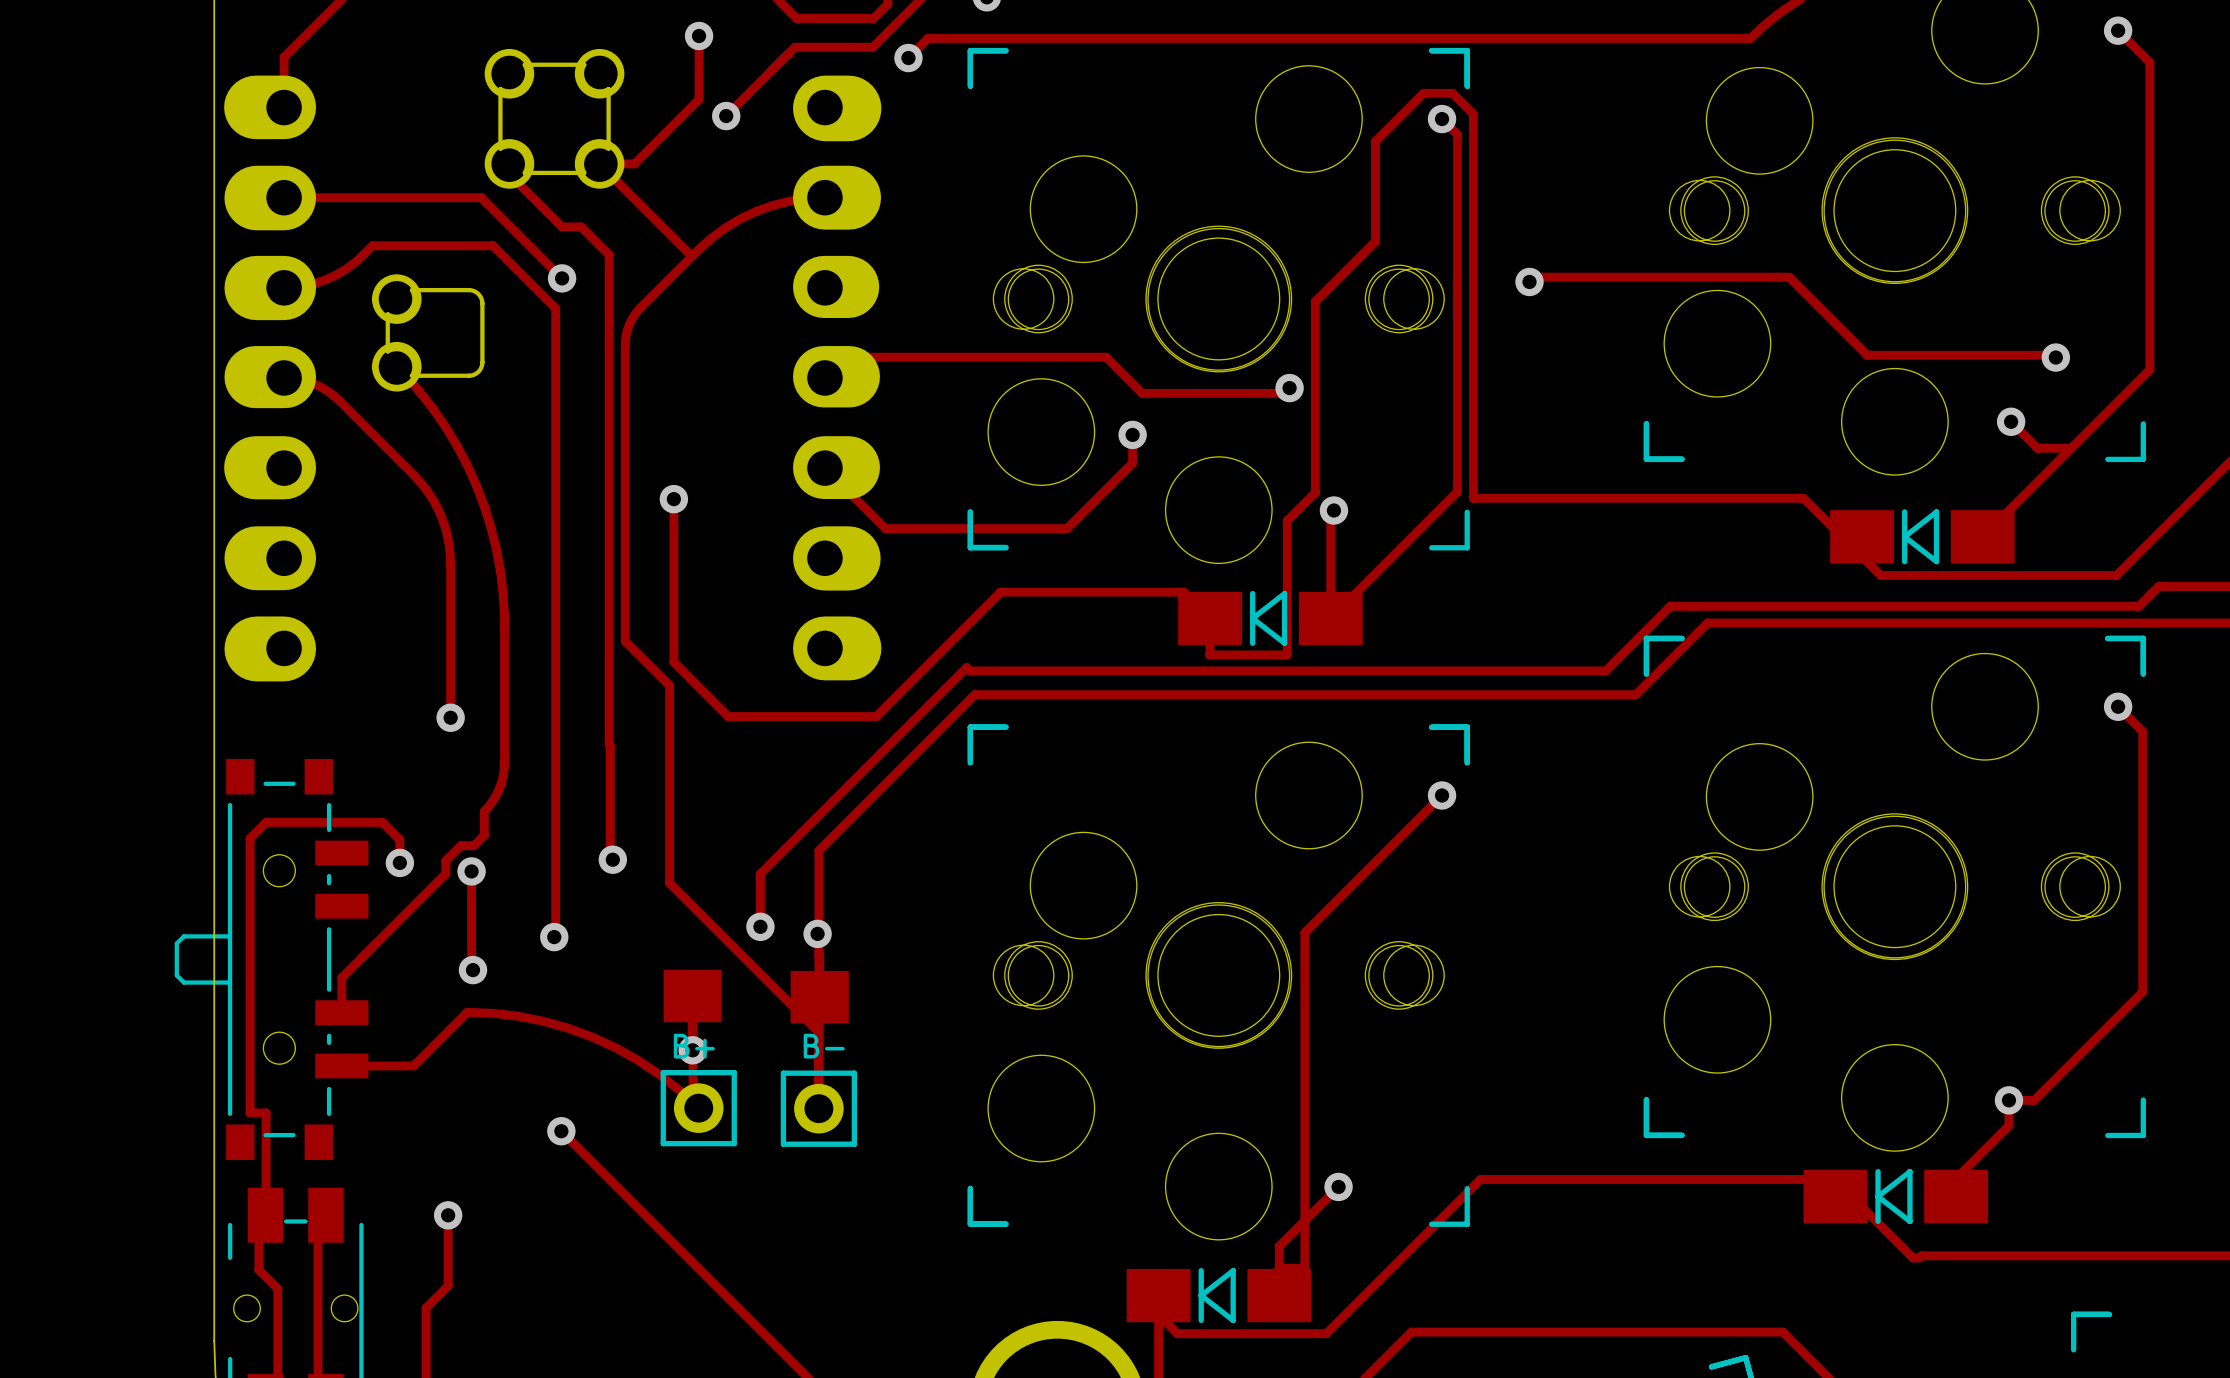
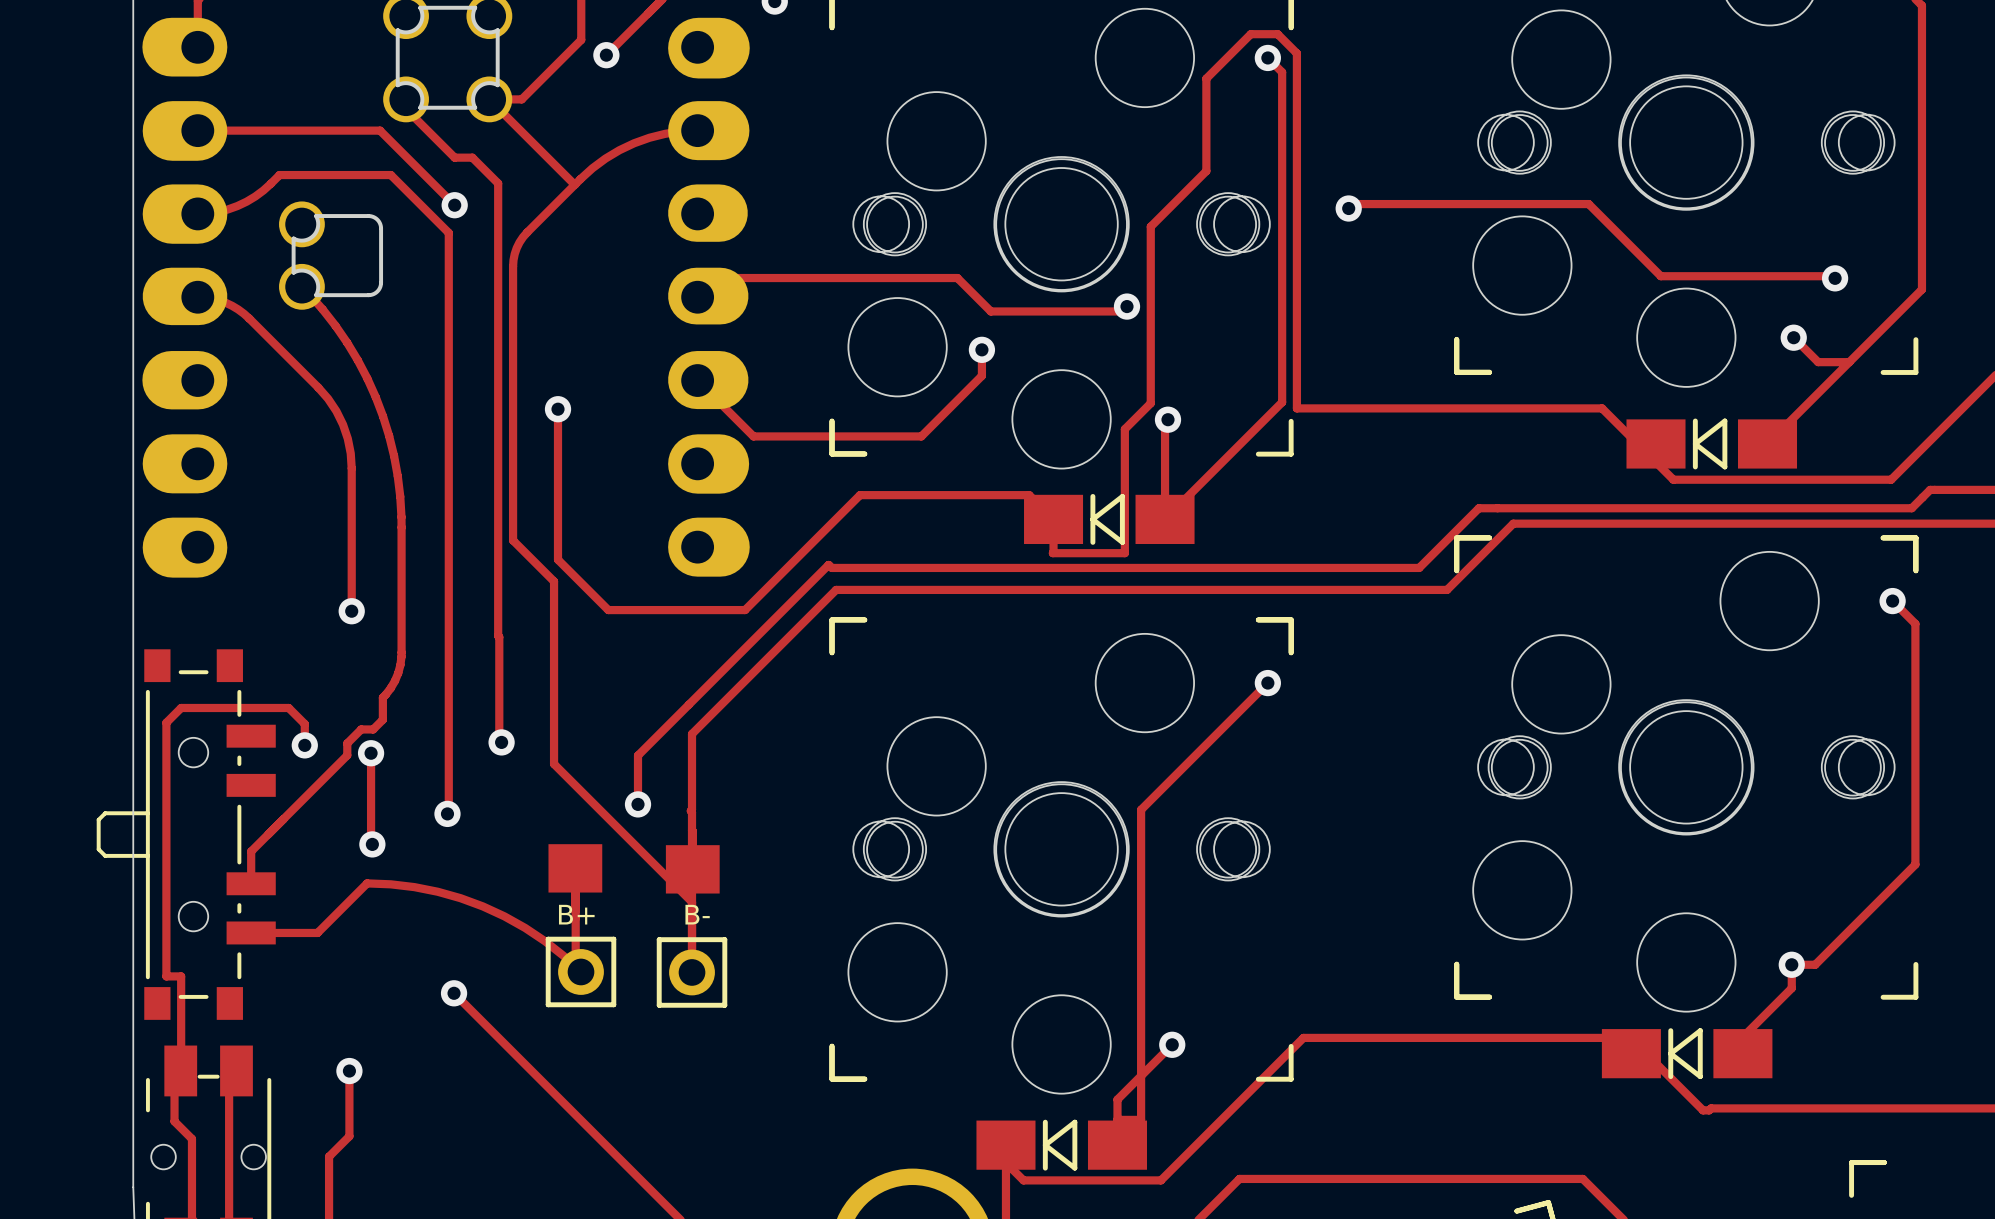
via: (817, 933) -> none
via: (692, 1050) -> none

